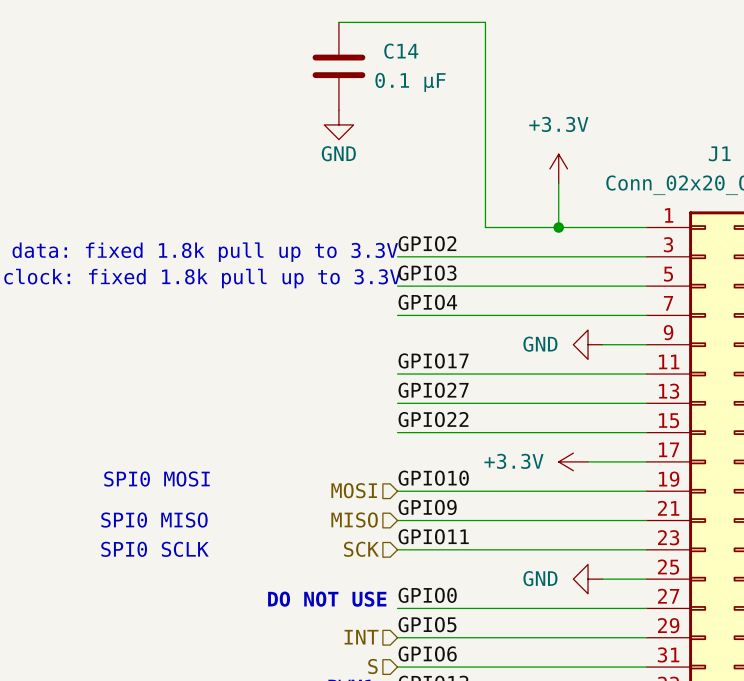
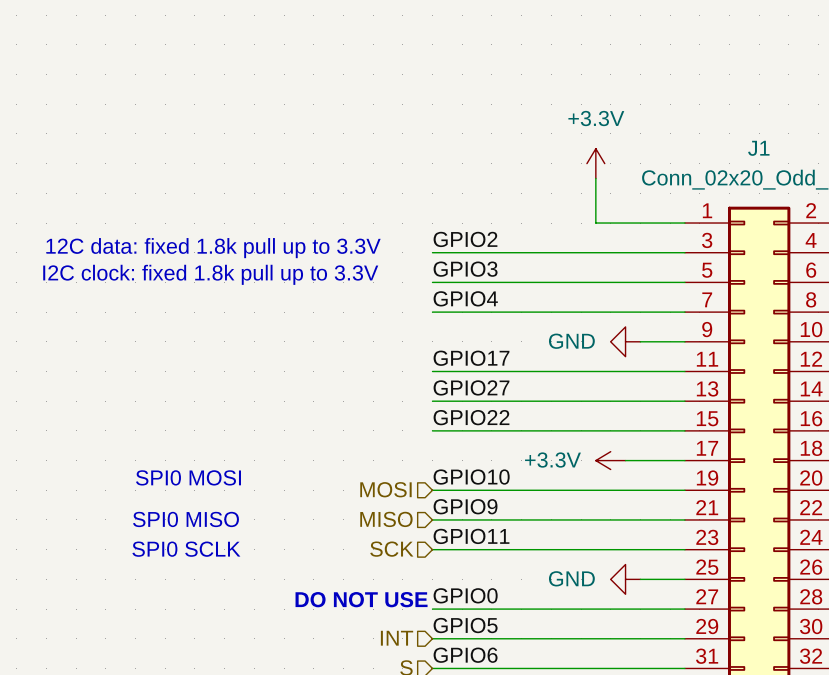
wire: (338, 22) (485, 22) (485, 227) (558, 227) -> none
C14: 0.1 µF (338, 66) -> none
power symbol: GND (338, 124) -> none
junction: (558, 227) -> none

